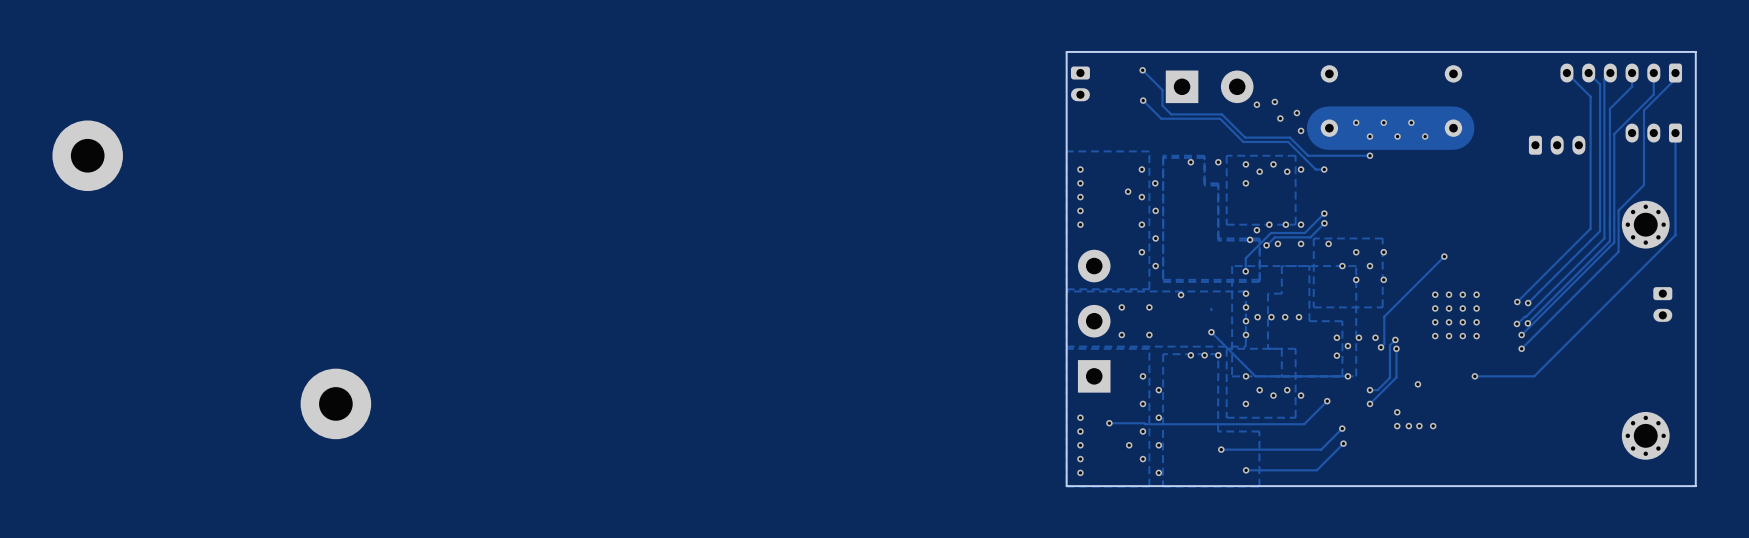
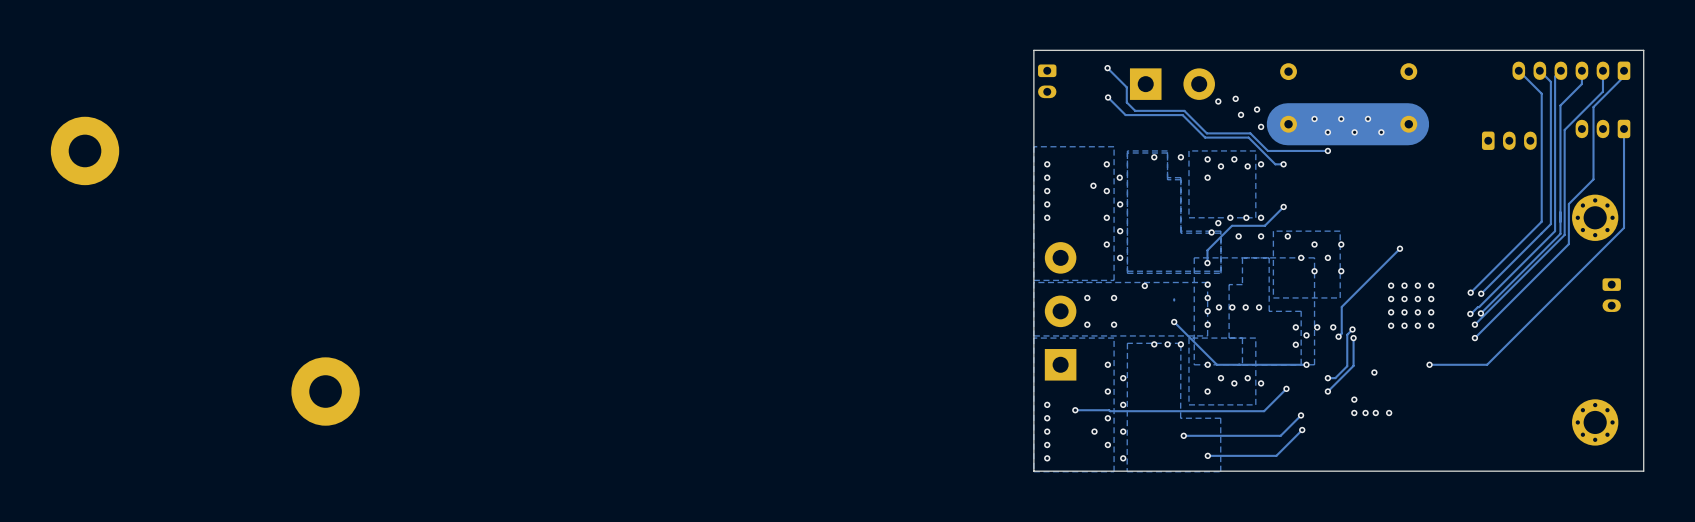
track: (1324, 223) (1310, 237) (1274, 237) (1266, 245) -> none
via: (1324, 223) -> none
via: (1266, 245) -> none

